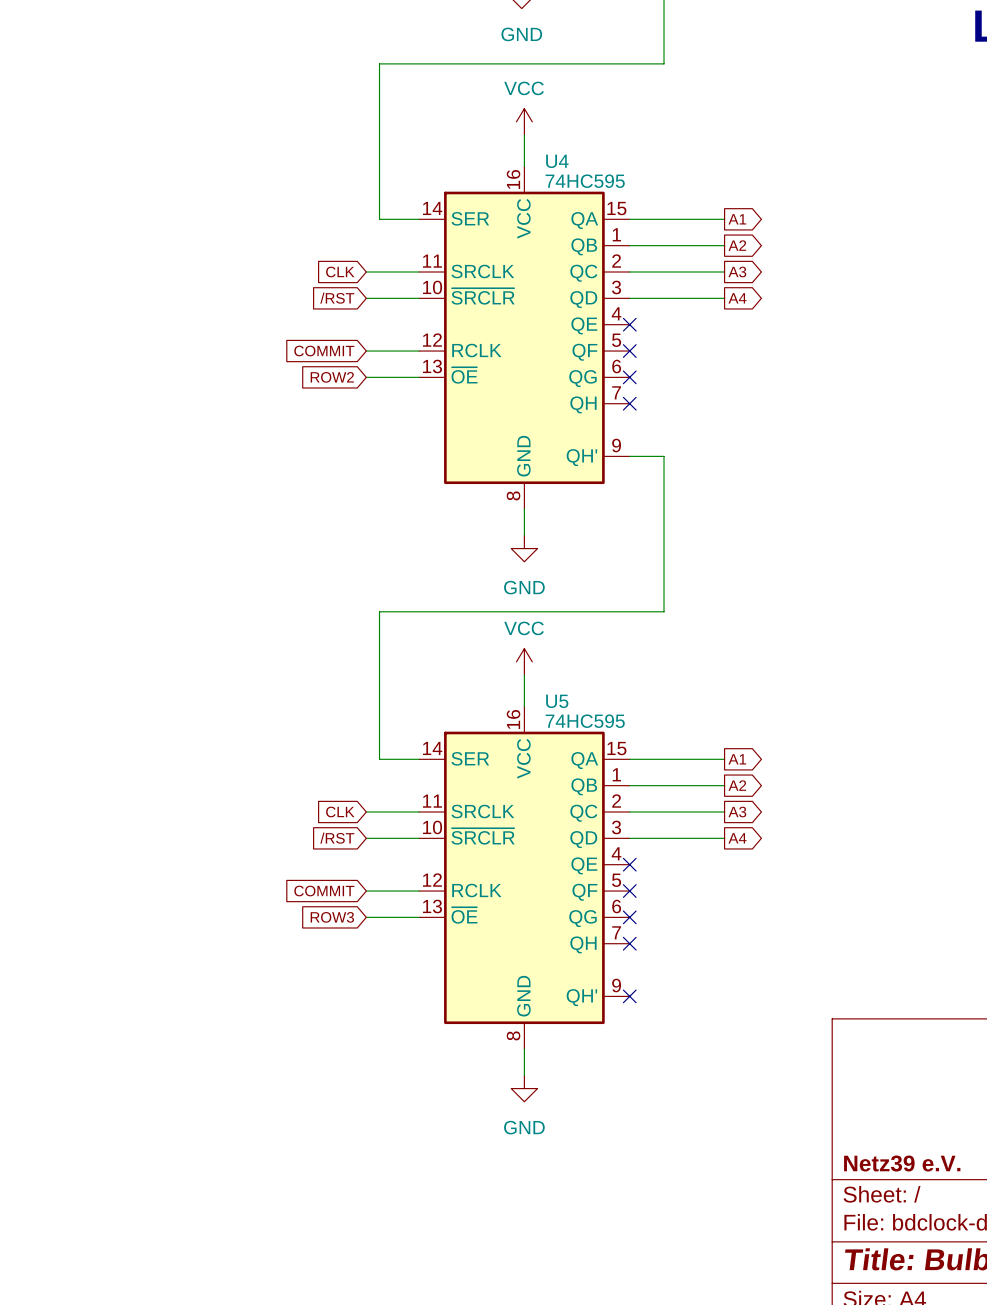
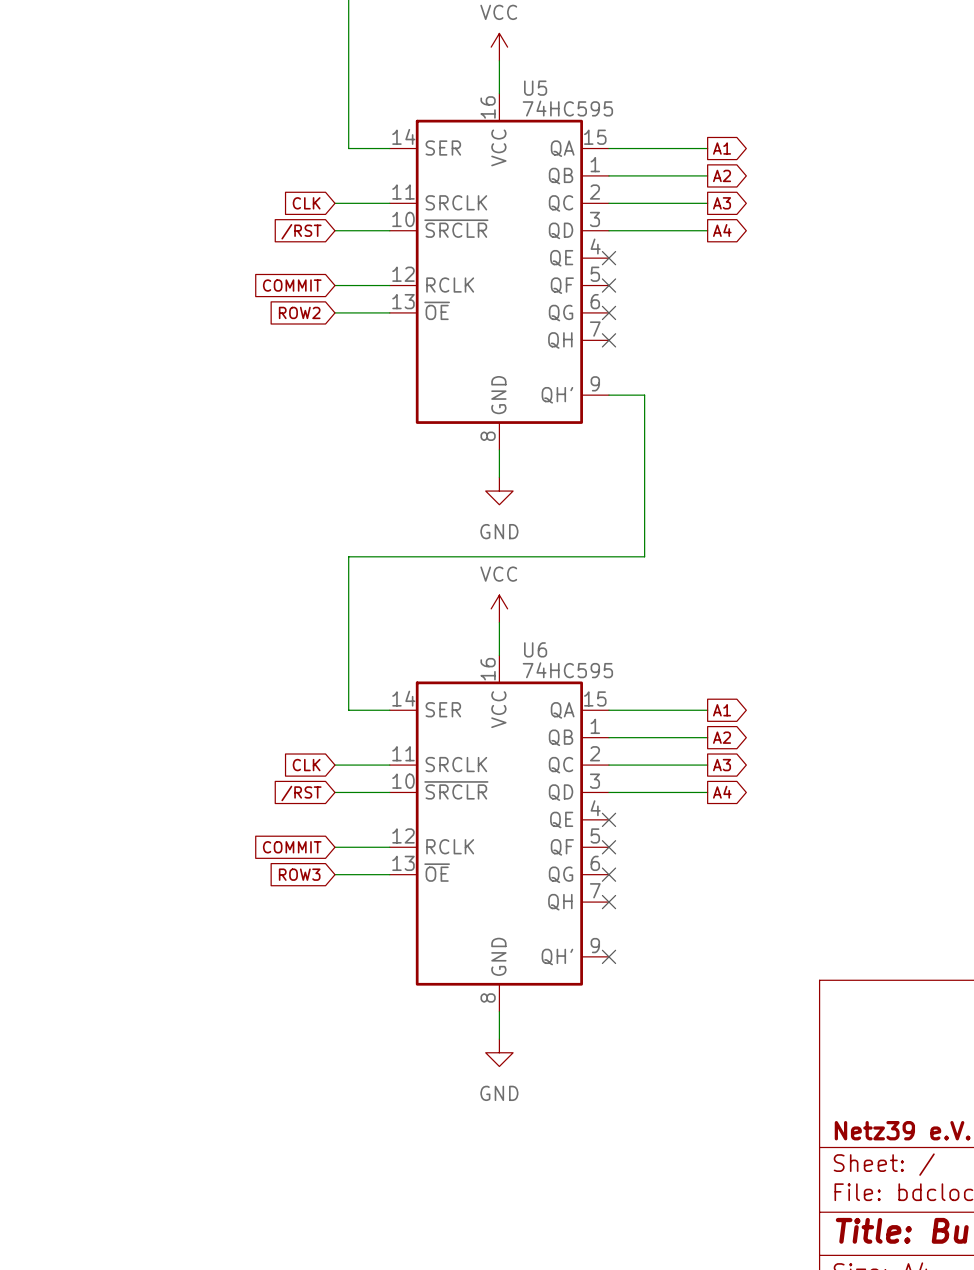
U4 name: U4 (557, 161) -> U5 (535, 88)
U5 name: U5 (557, 701) -> U6 (535, 649)

